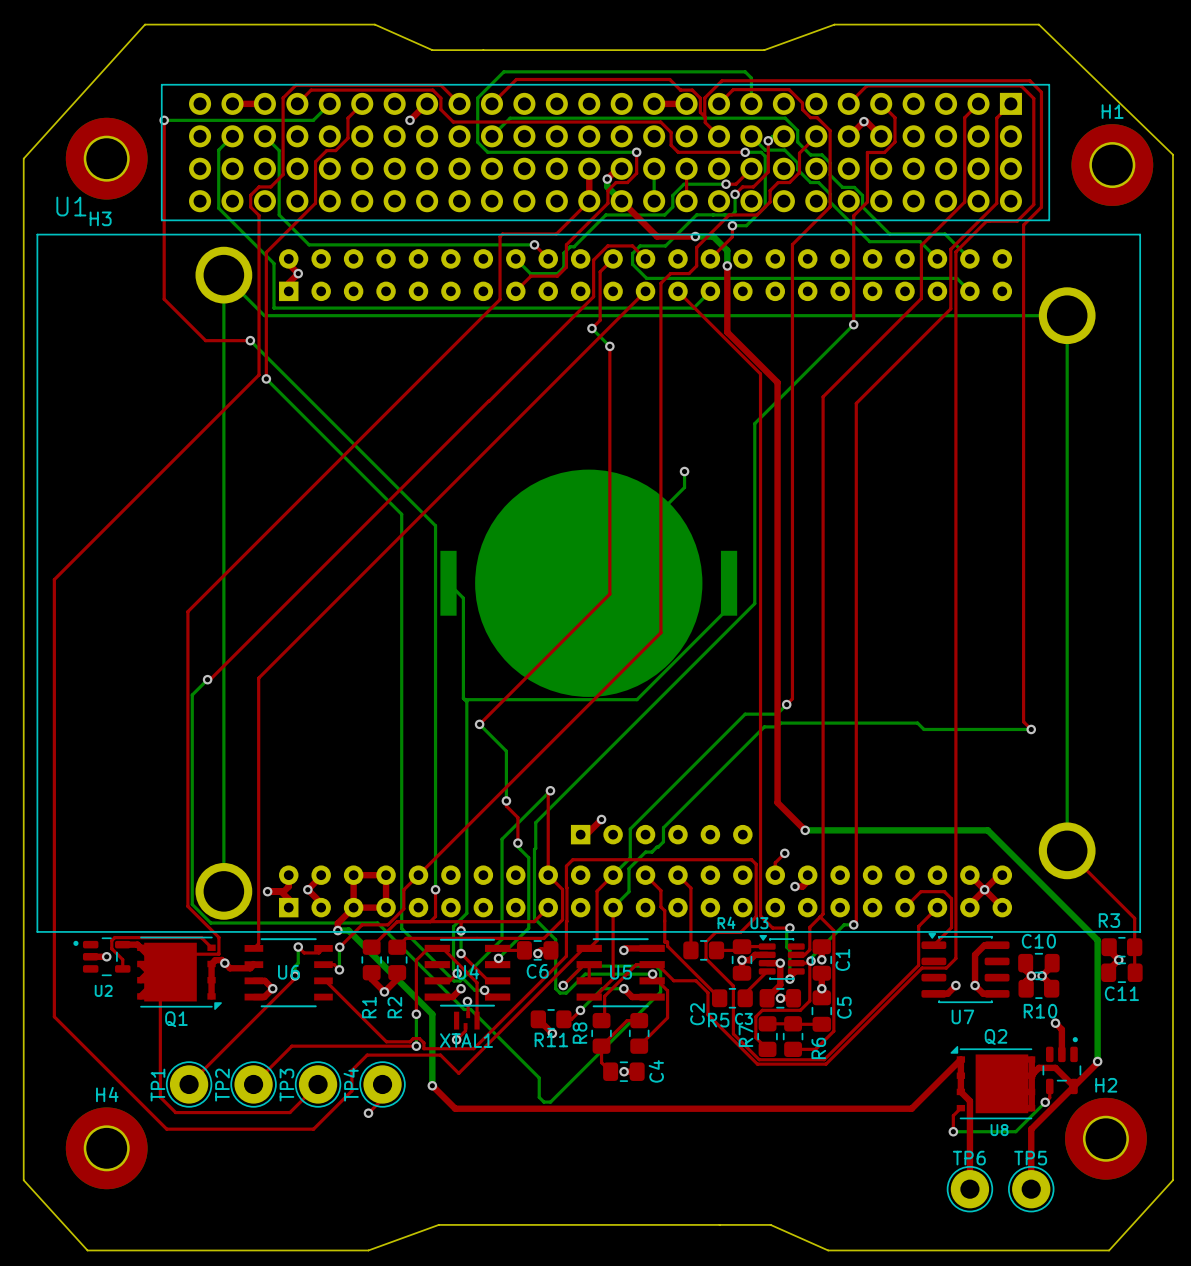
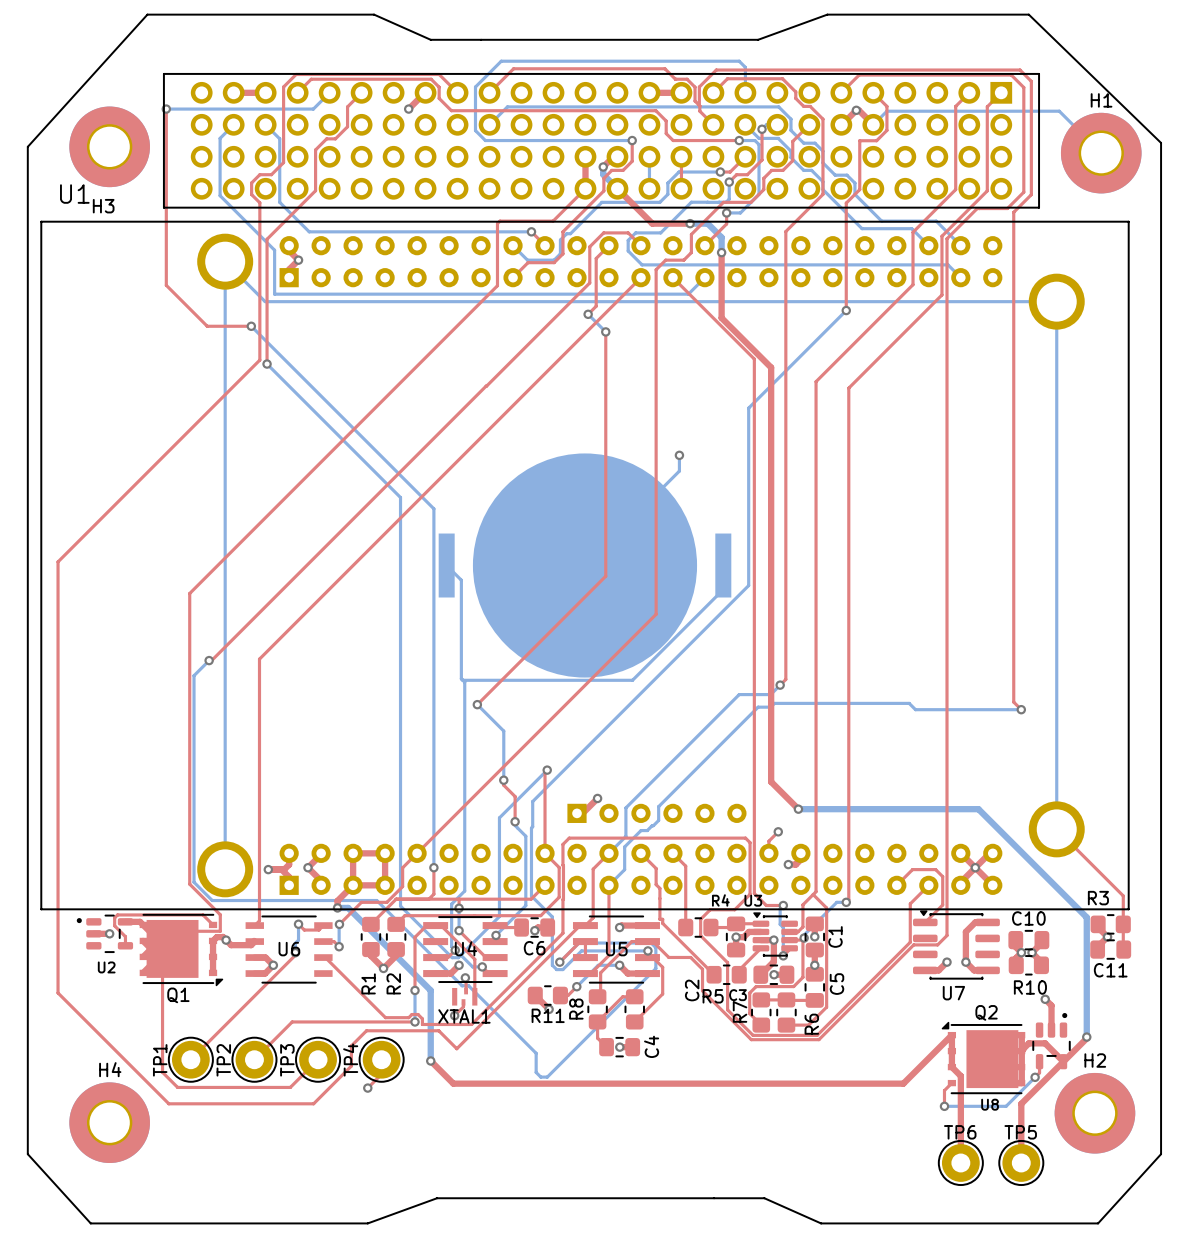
bottom track: none -> (873, 124) (886, 111) (1059, 111) (1101, 153)

